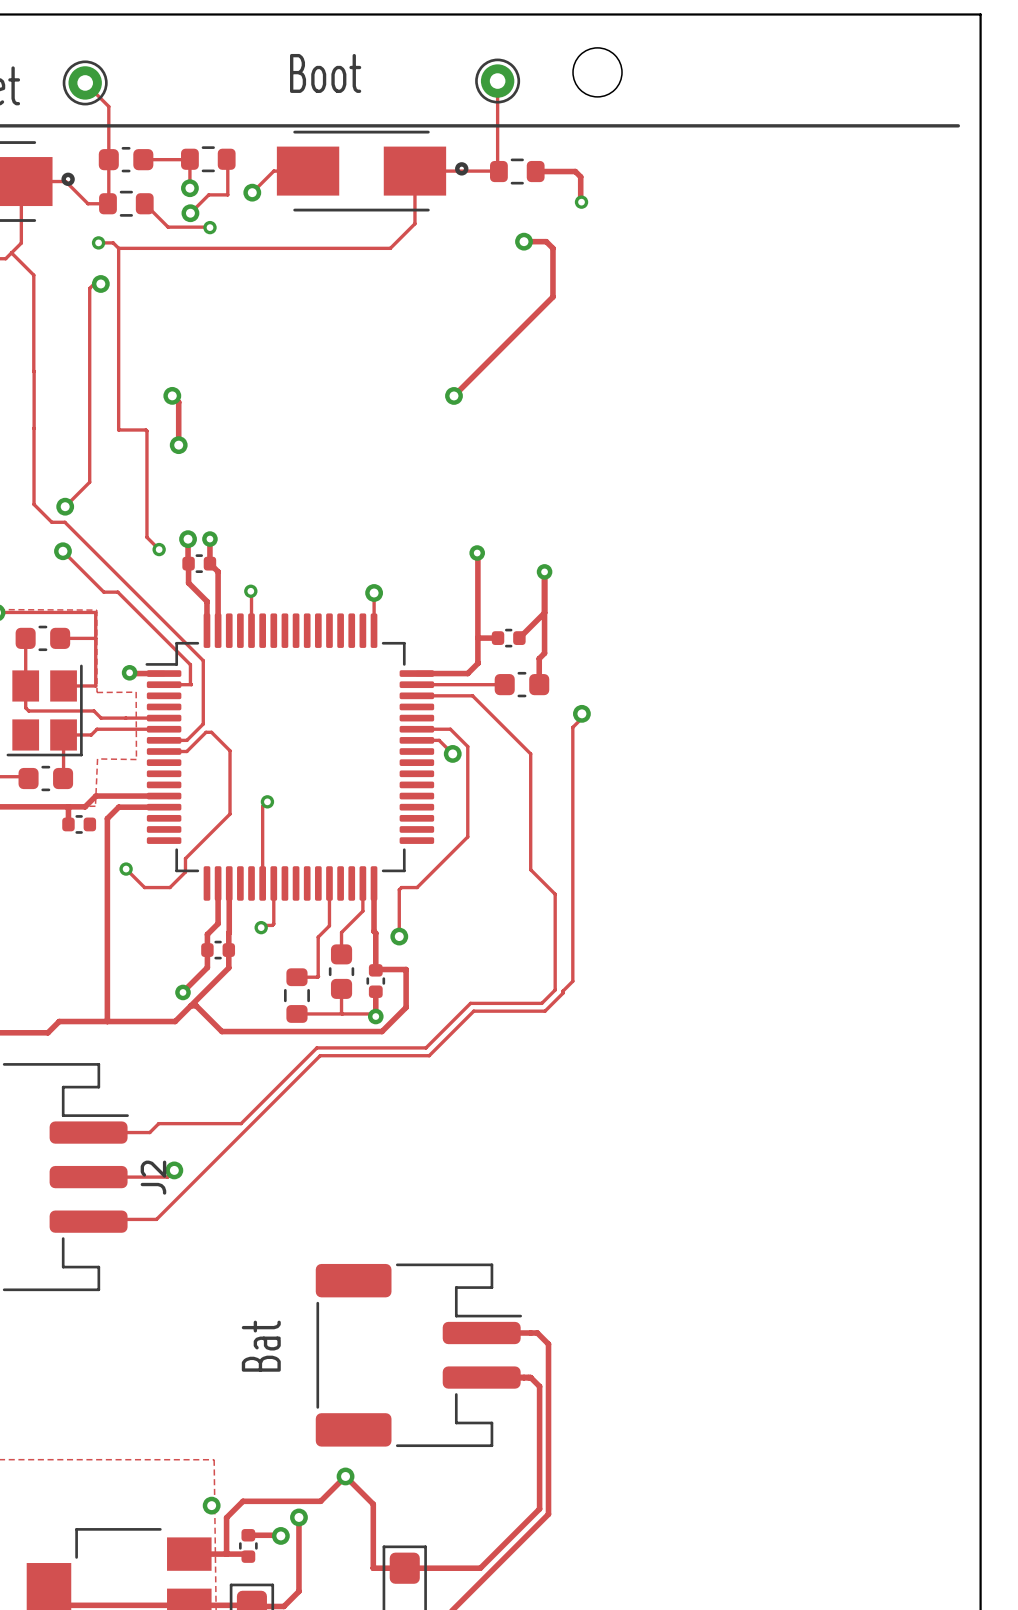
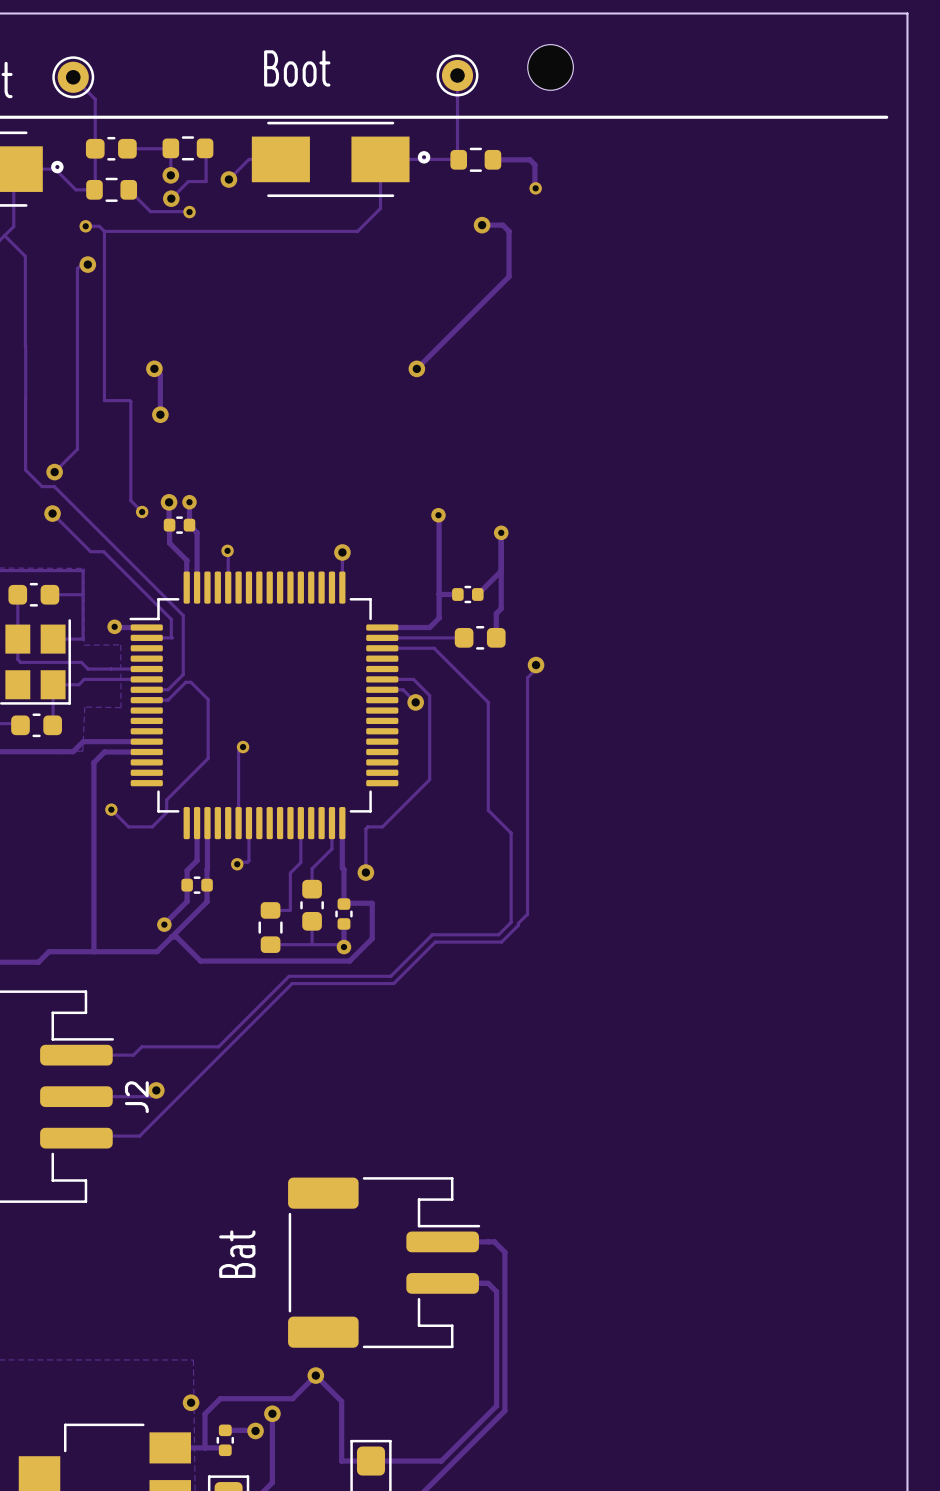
track: (68, 806) (68, 824) -> none
part: (79, 824) -> none

